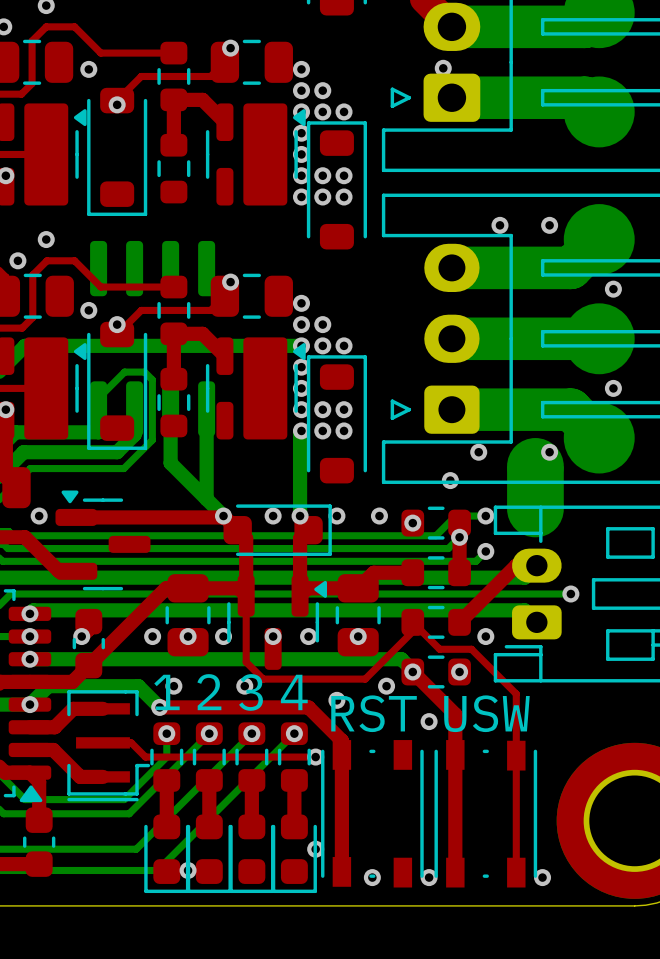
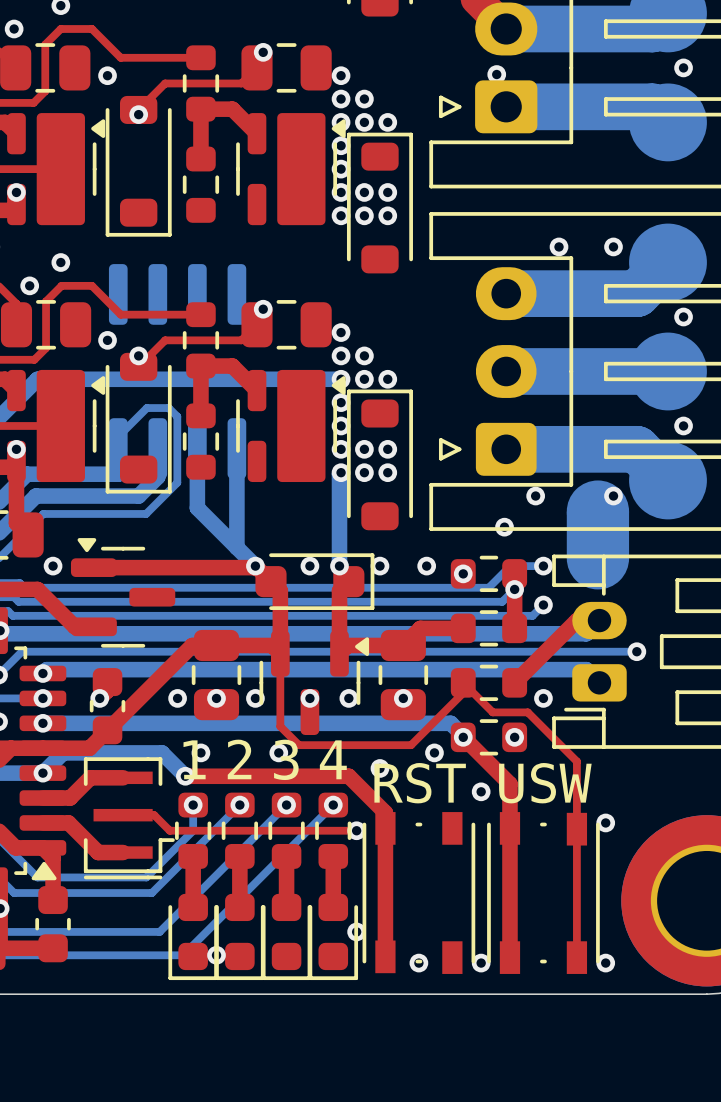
via: none -> (683, 67)
via: none -> (605, 822)

